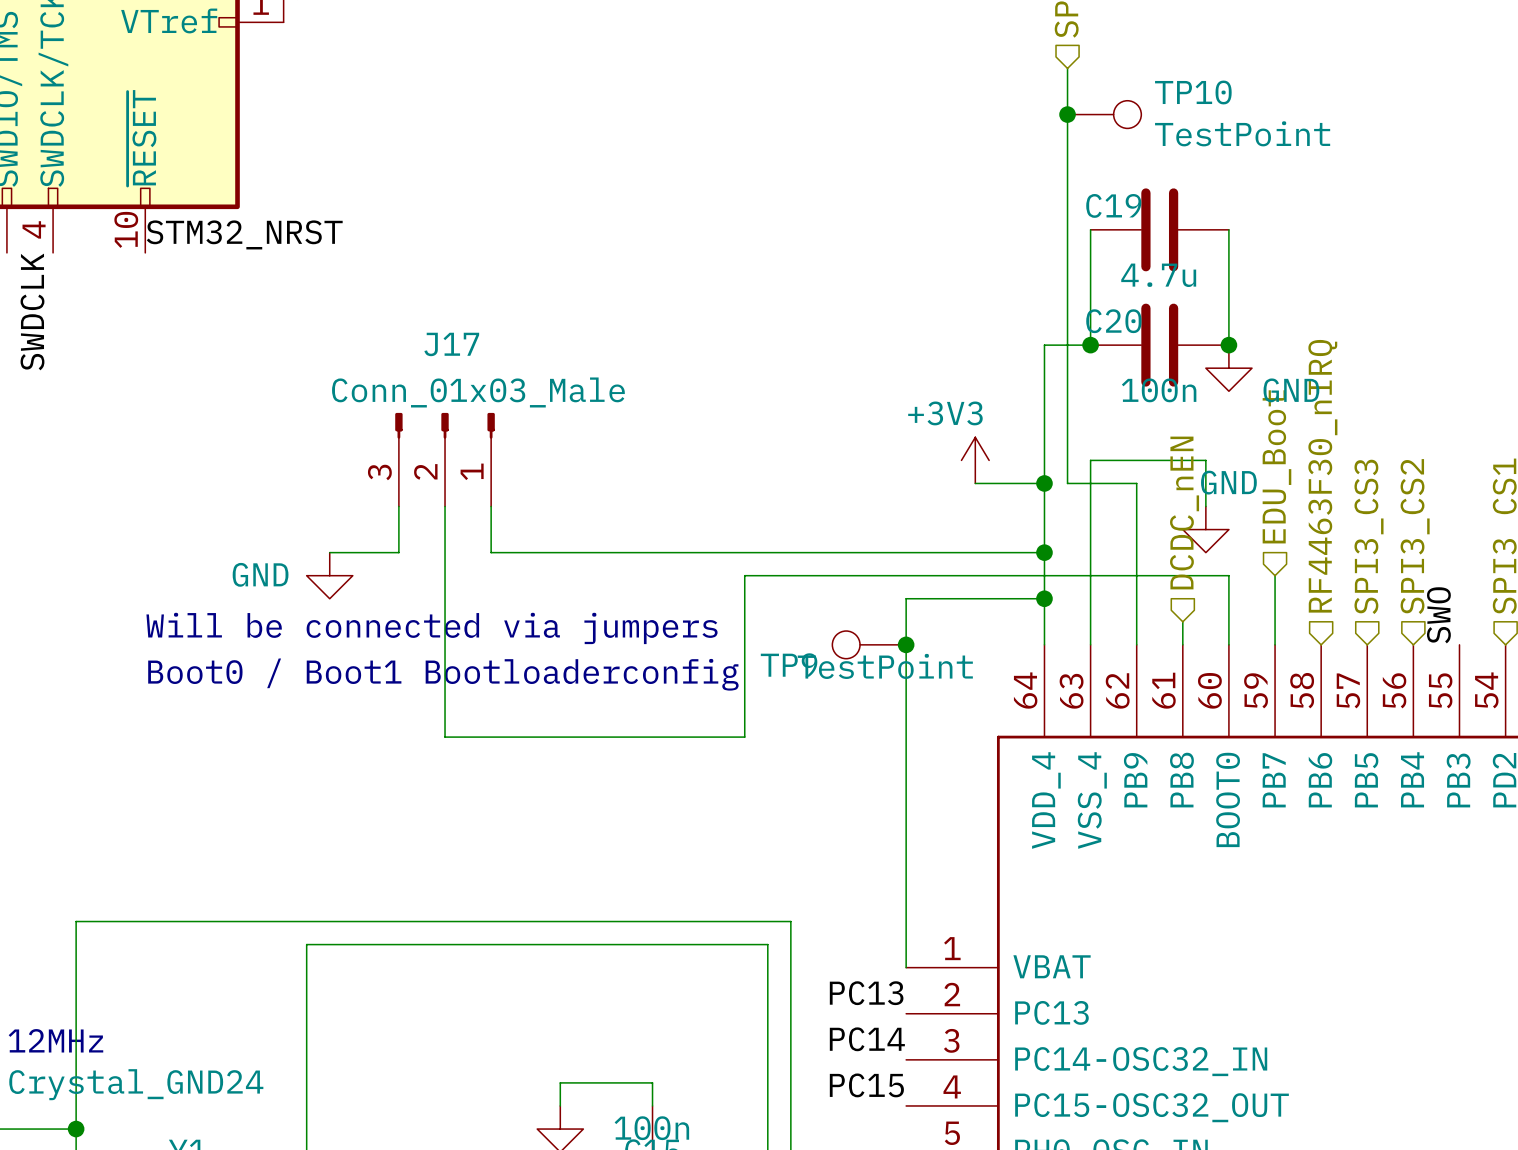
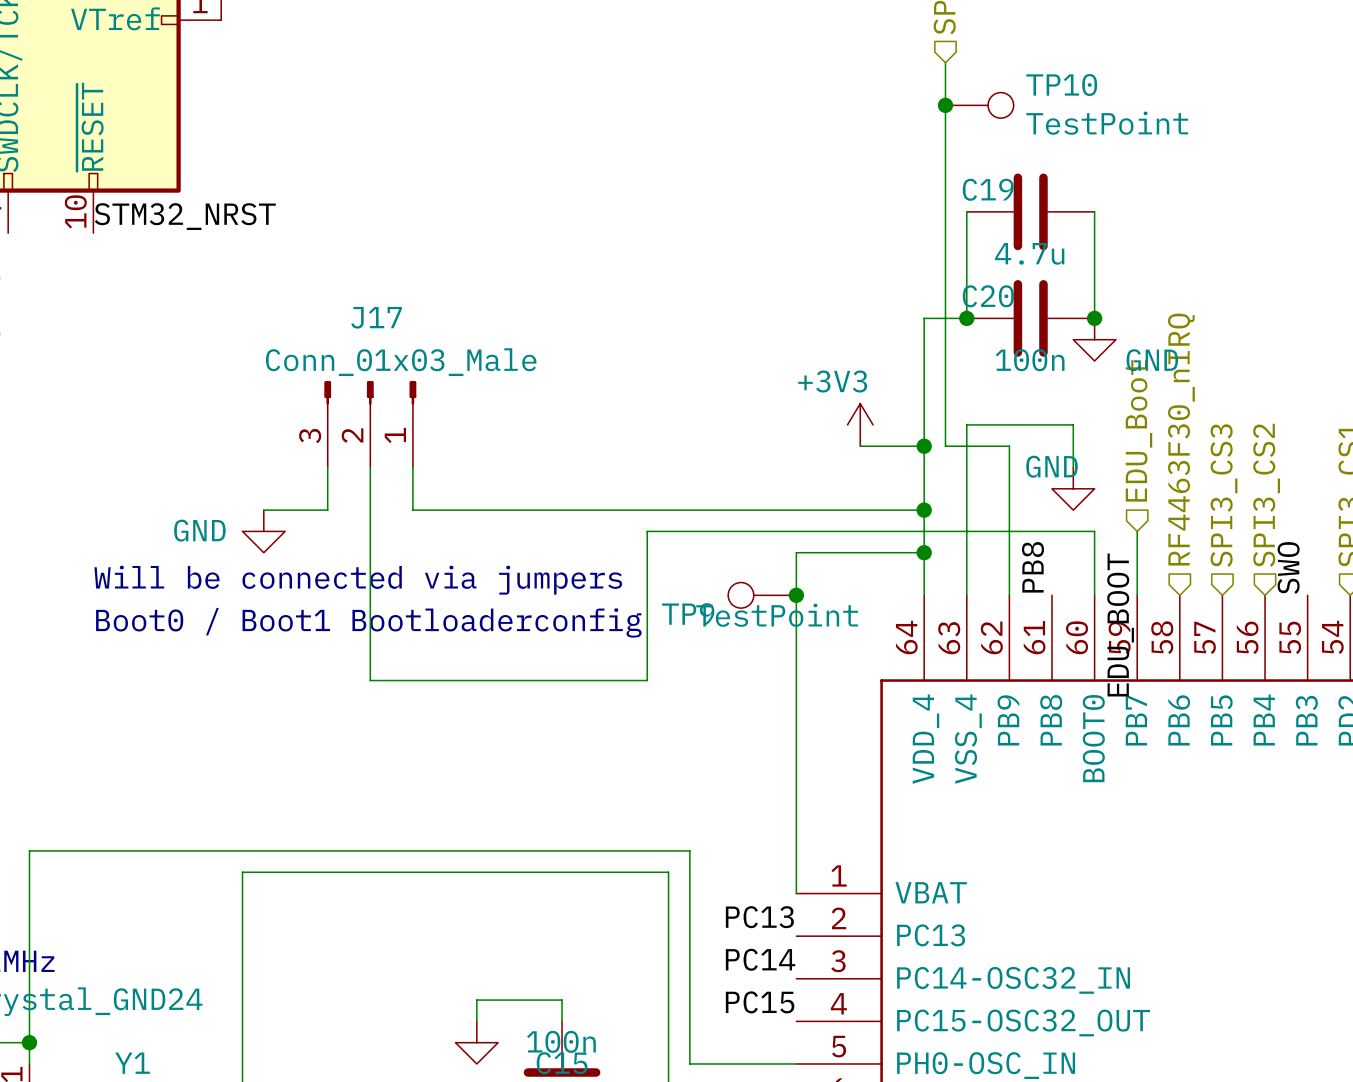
power symbol text position: GND (1228, 482) -> GND (1051, 466)
hierarchical label: DCDC_nEN (1184, 512) -> none
label: none -> PB8 (1032, 567)
wire: (1182, 621) (1182, 644) -> none
label: none -> EDU_BOOT (1120, 624)

